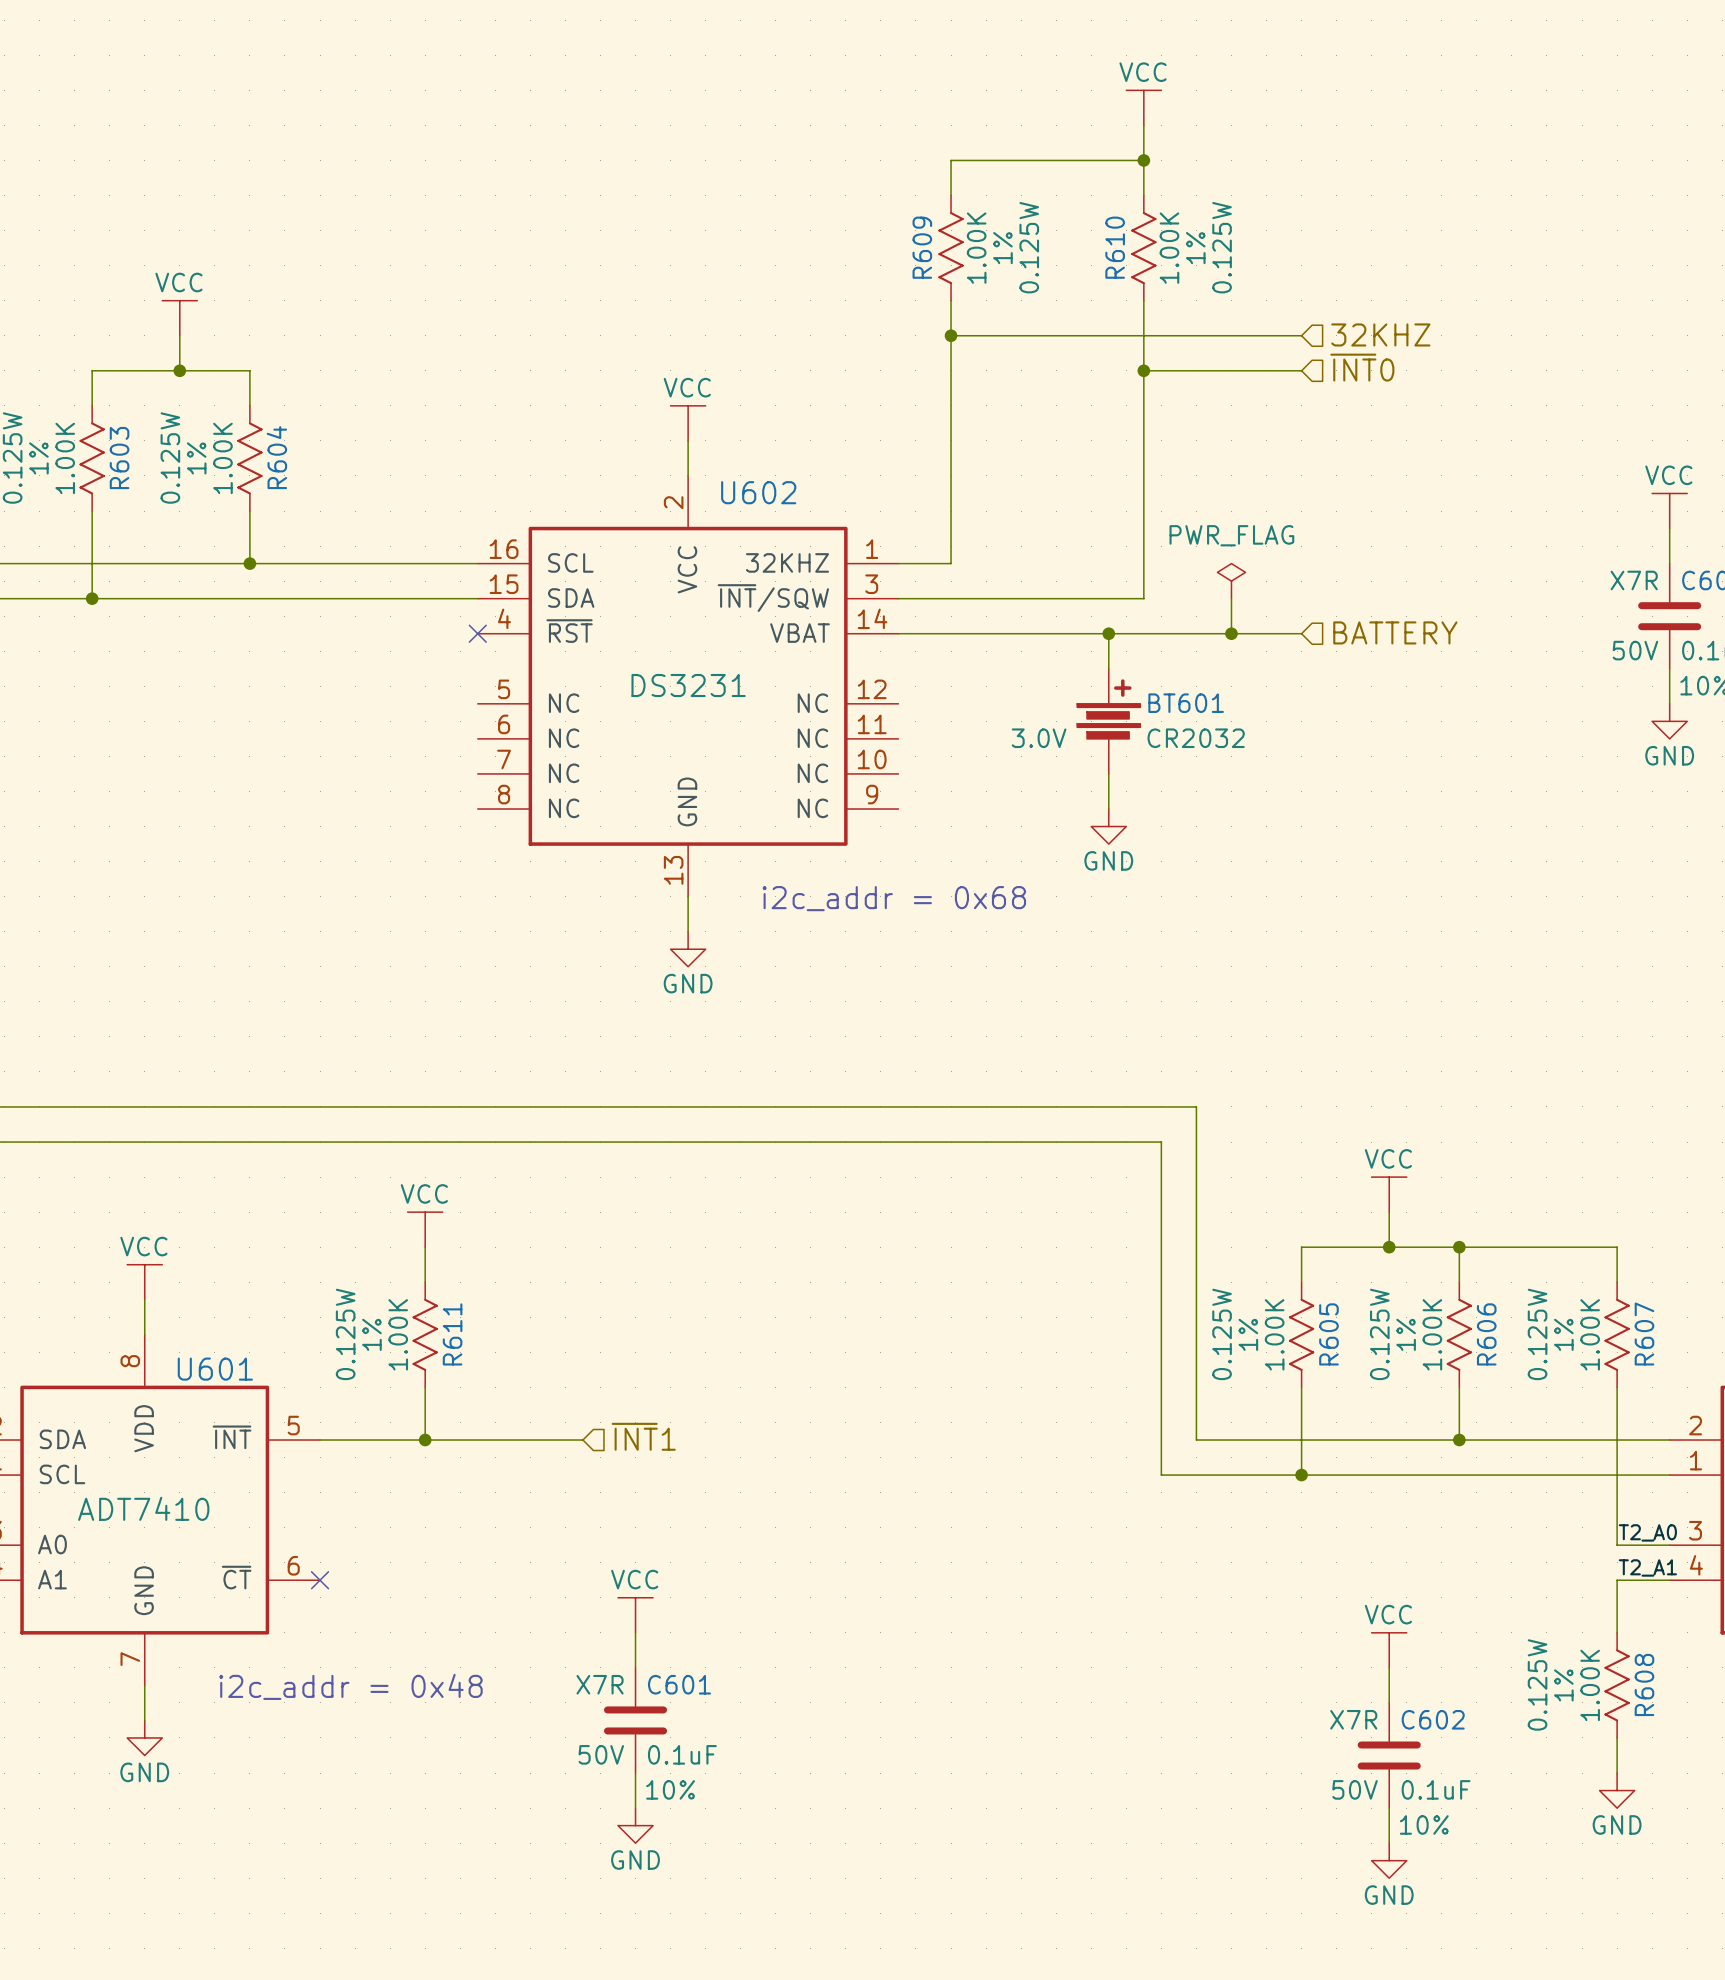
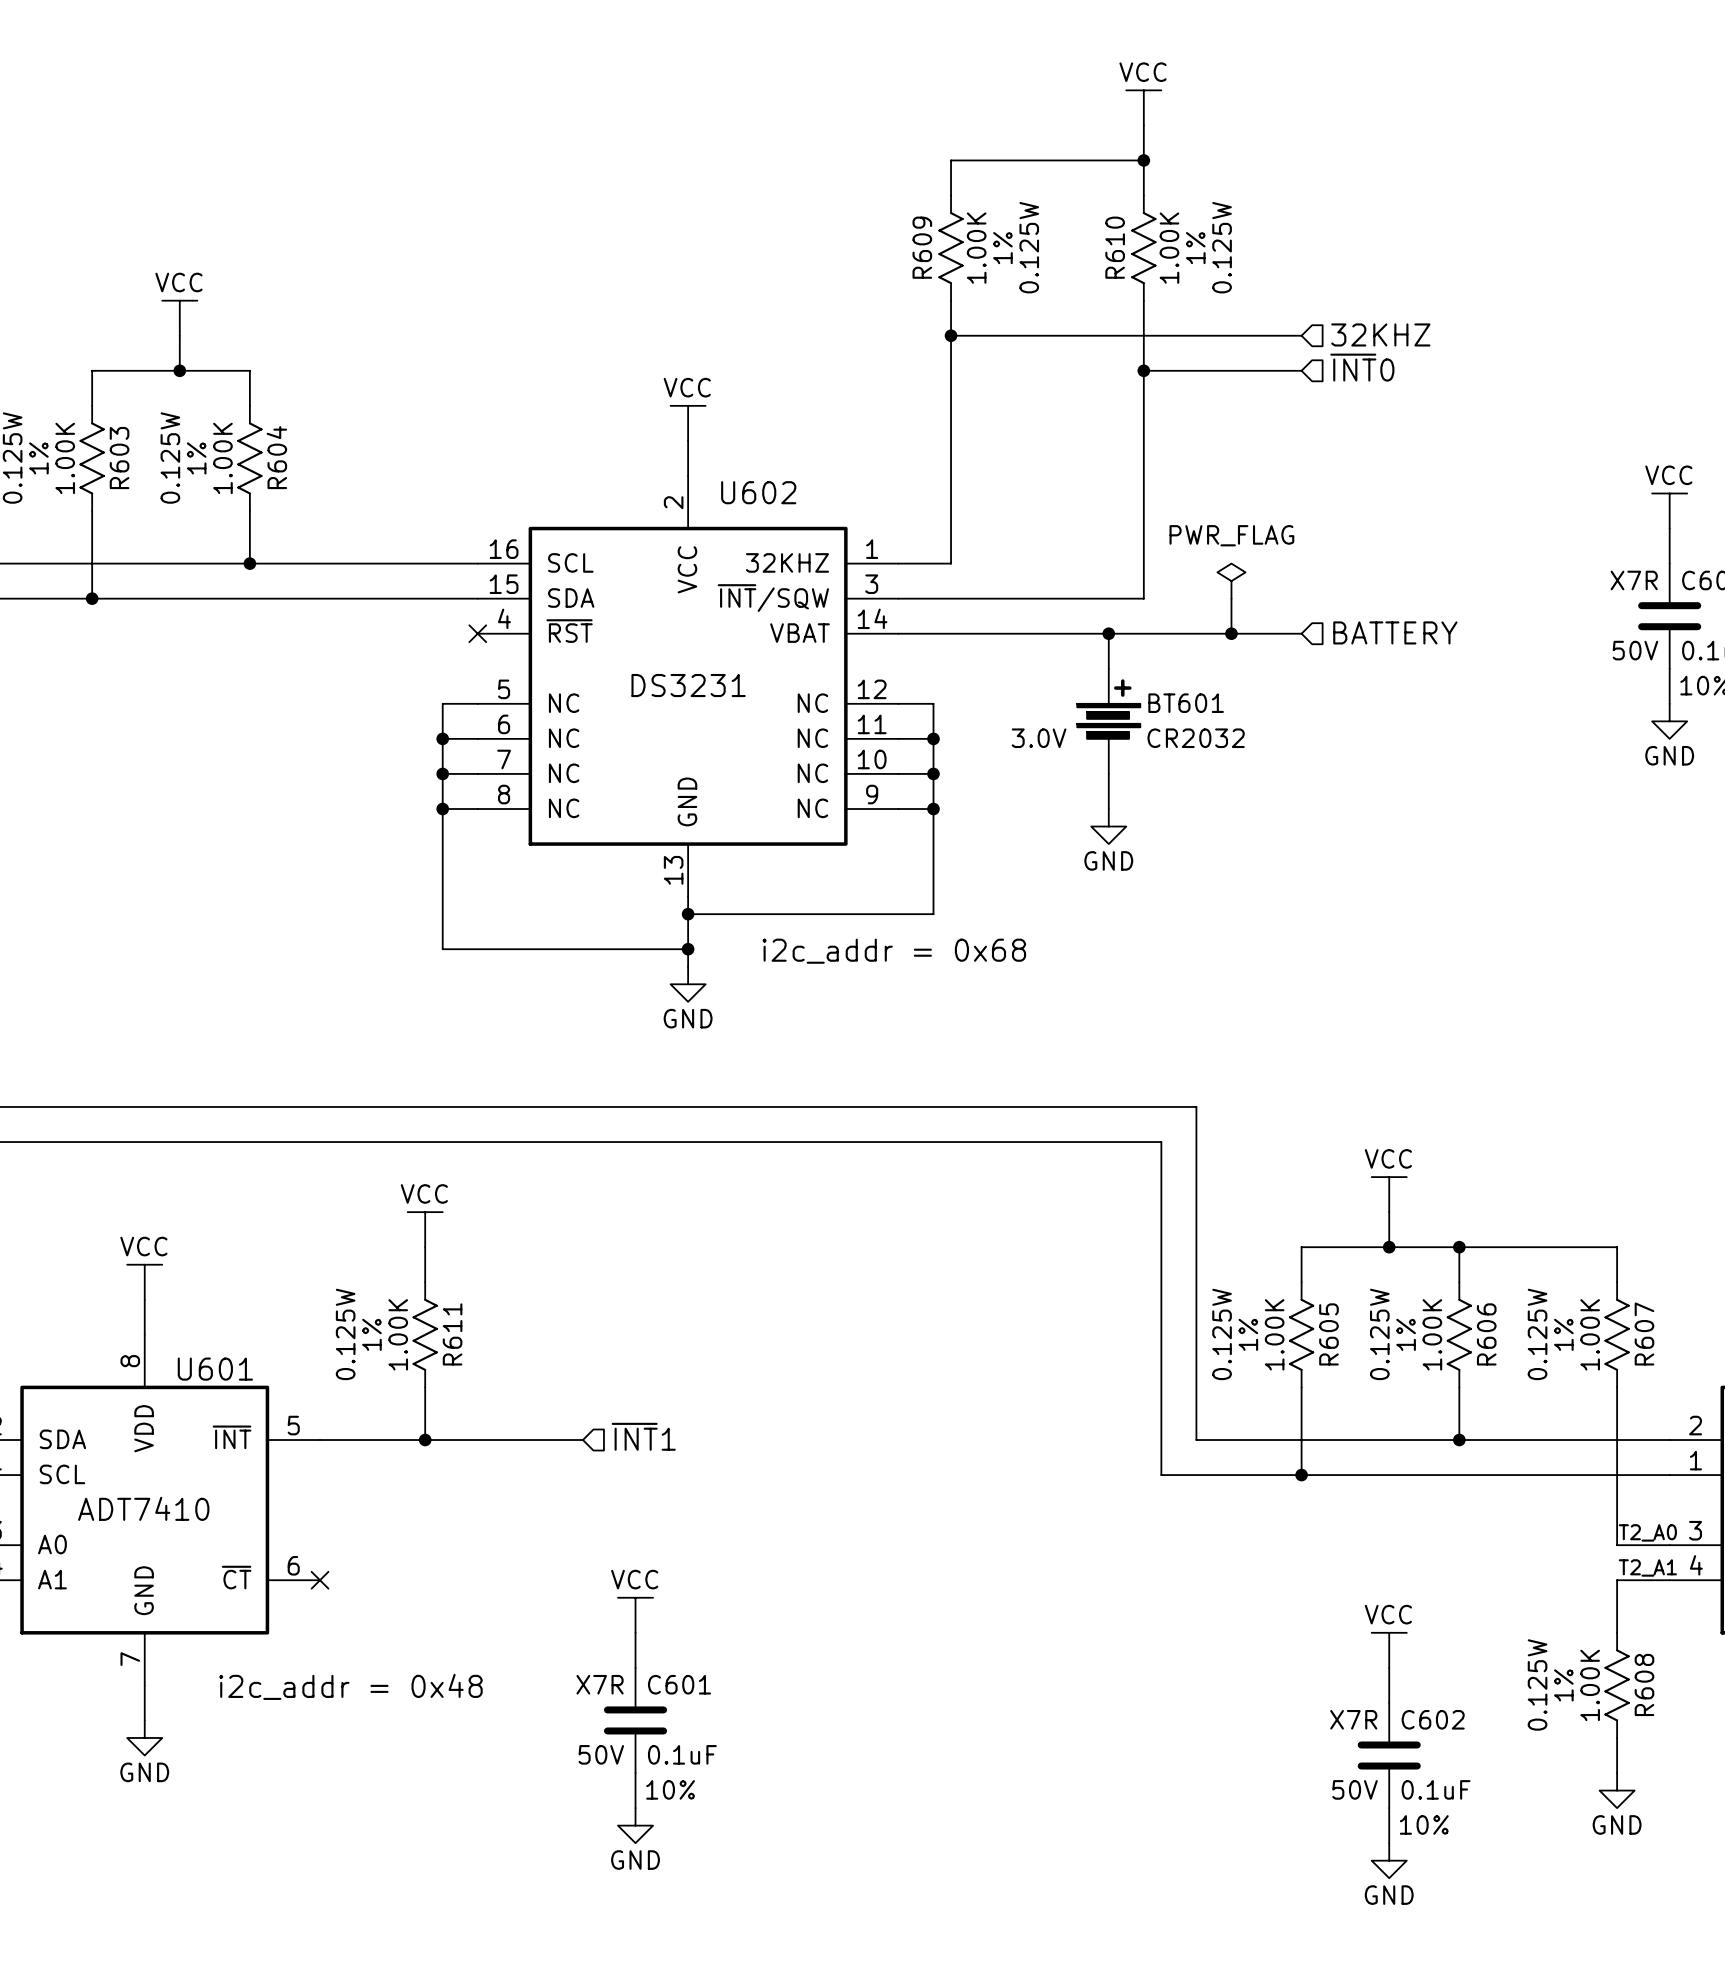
wire: none -> (477, 703) (442, 703) (442, 949) (688, 949)
wire: none -> (898, 703) (933, 703) (933, 914) (688, 914)
wire: none -> (442, 738) (477, 738)
junction: none -> (442, 738)
wire: none -> (898, 738) (933, 738)
junction: none -> (933, 738)
wire: none -> (442, 773) (477, 773)
junction: none -> (442, 773)
wire: none -> (898, 773) (933, 773)
junction: none -> (933, 773)
wire: none -> (442, 809) (477, 809)
junction: none -> (442, 809)
wire: none -> (898, 809) (933, 809)
junction: none -> (933, 809)
text position: i2c_addr = 0x68 (894, 898) -> i2c_addr = 0x68 (894, 951)
junction: none -> (688, 914)
power symbol position: GND (688, 949) -> GND (688, 984)
junction: none -> (688, 949)

